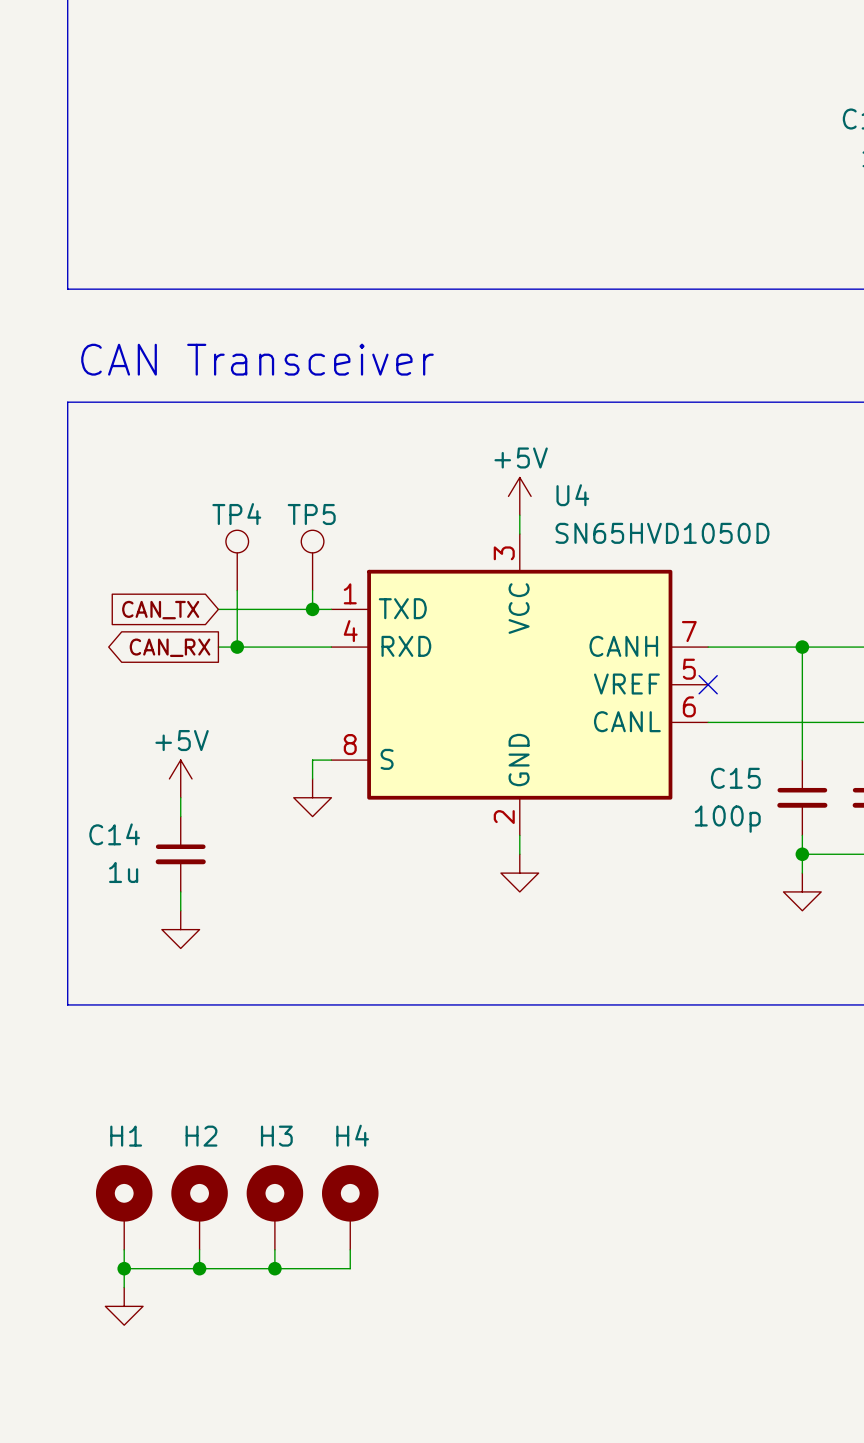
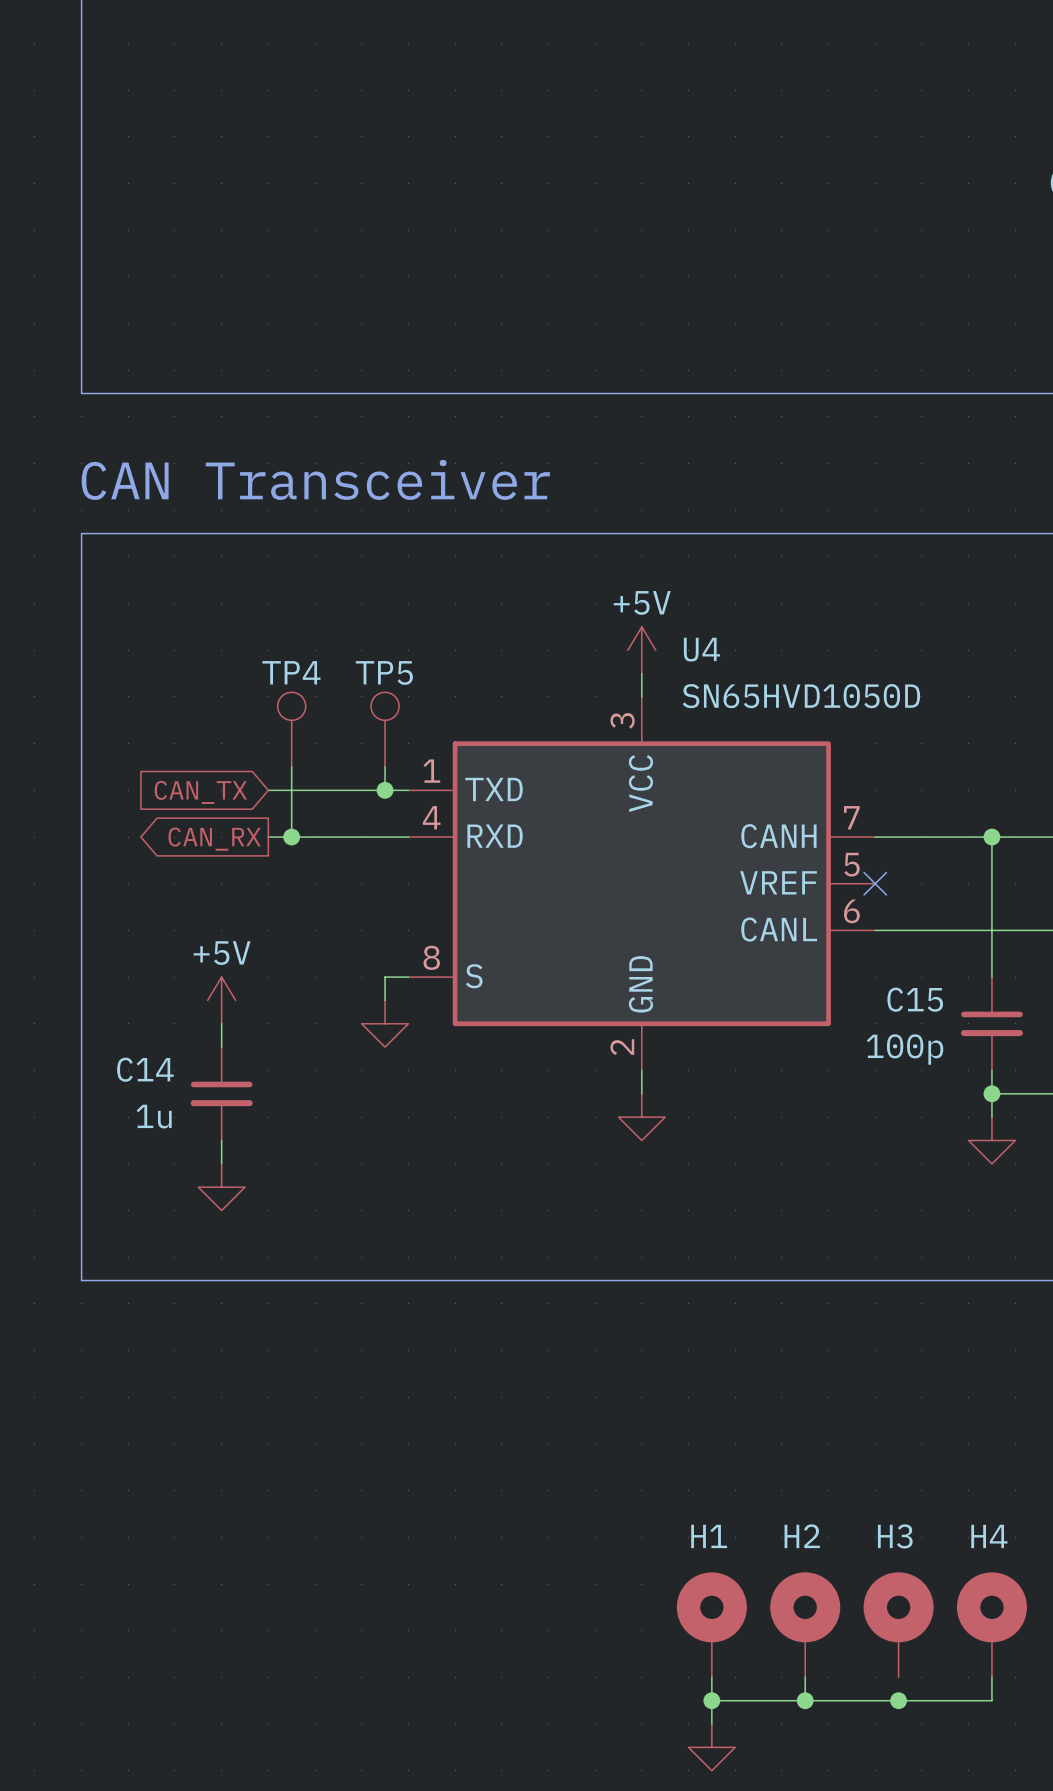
H1 position: (124, 1207) -> (711, 1624)
H2 position: (199, 1207) -> (805, 1624)
H3 position: (274, 1207) -> (898, 1624)
H4 position: (350, 1207) -> (991, 1624)
wire: (124, 1249) (124, 1287) -> none
wire: (199, 1249) (199, 1268) -> none
wire: (274, 1249) (274, 1268) -> none
wire: (350, 1249) (350, 1268) (124, 1268) -> none
junction: (124, 1268) -> none
junction: (199, 1268) -> none
junction: (274, 1268) -> none
power symbol: (124, 1306) -> none
wire: none -> (711, 1677) (711, 1724)
wire: none -> (805, 1677) (805, 1700)
wire: none -> (991, 1677) (991, 1700) (711, 1700)
junction: none -> (711, 1700)
junction: none -> (805, 1700)
junction: none -> (898, 1700)
power symbol: none -> (711, 1747)

